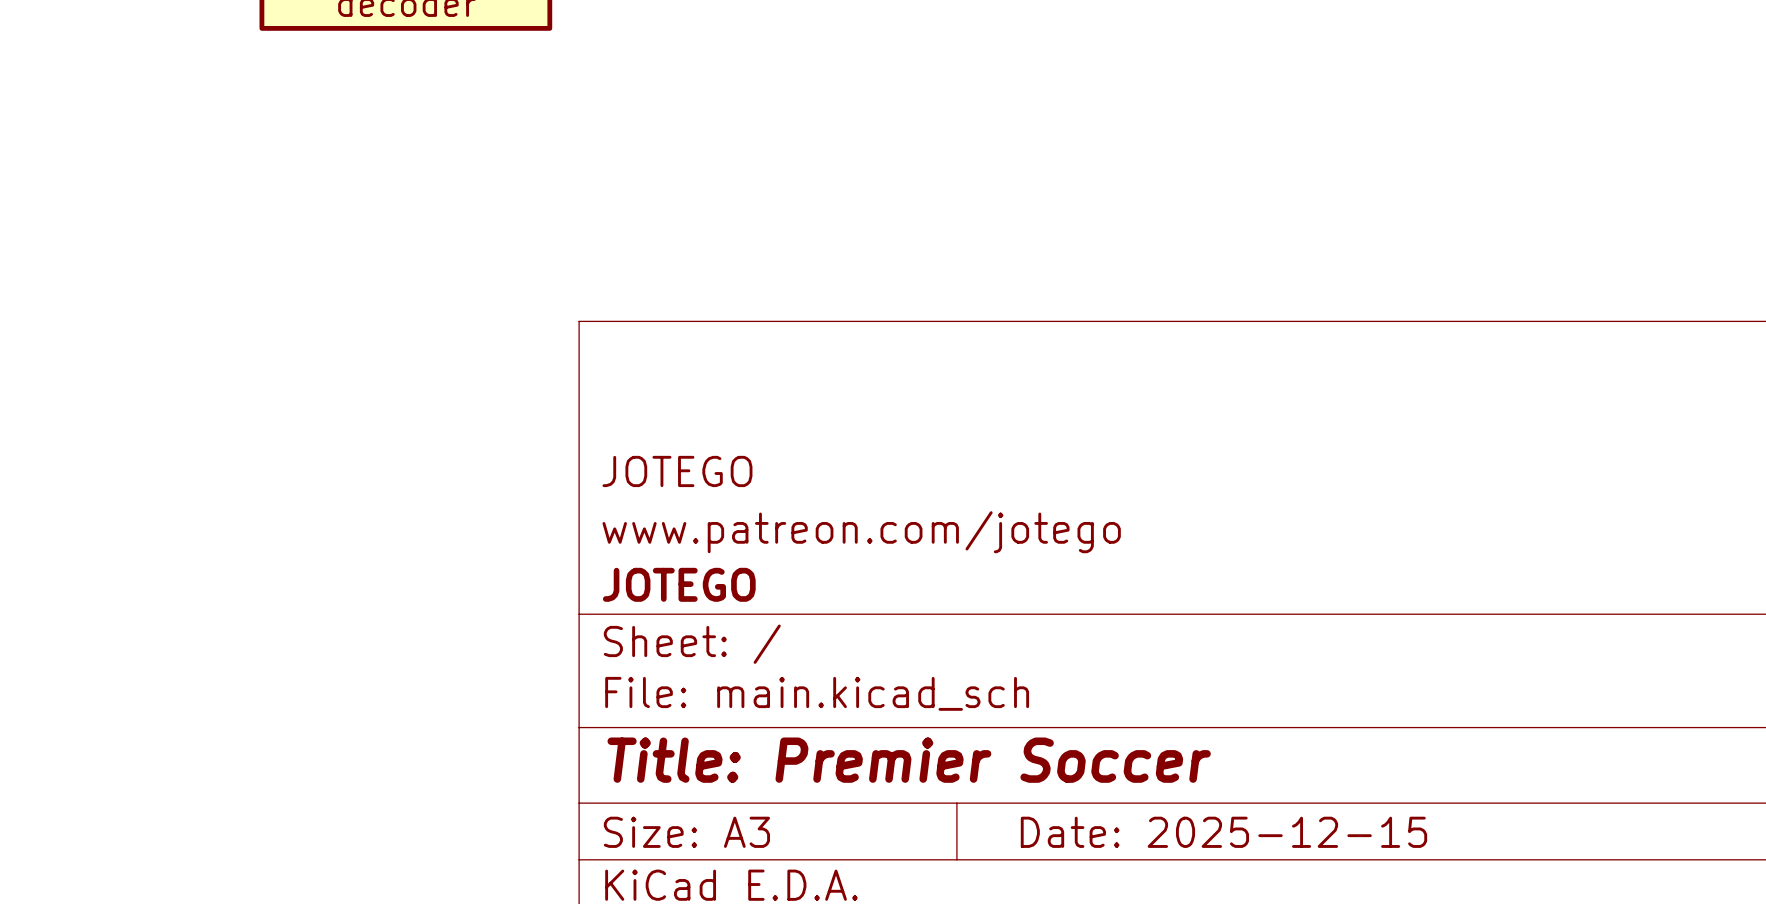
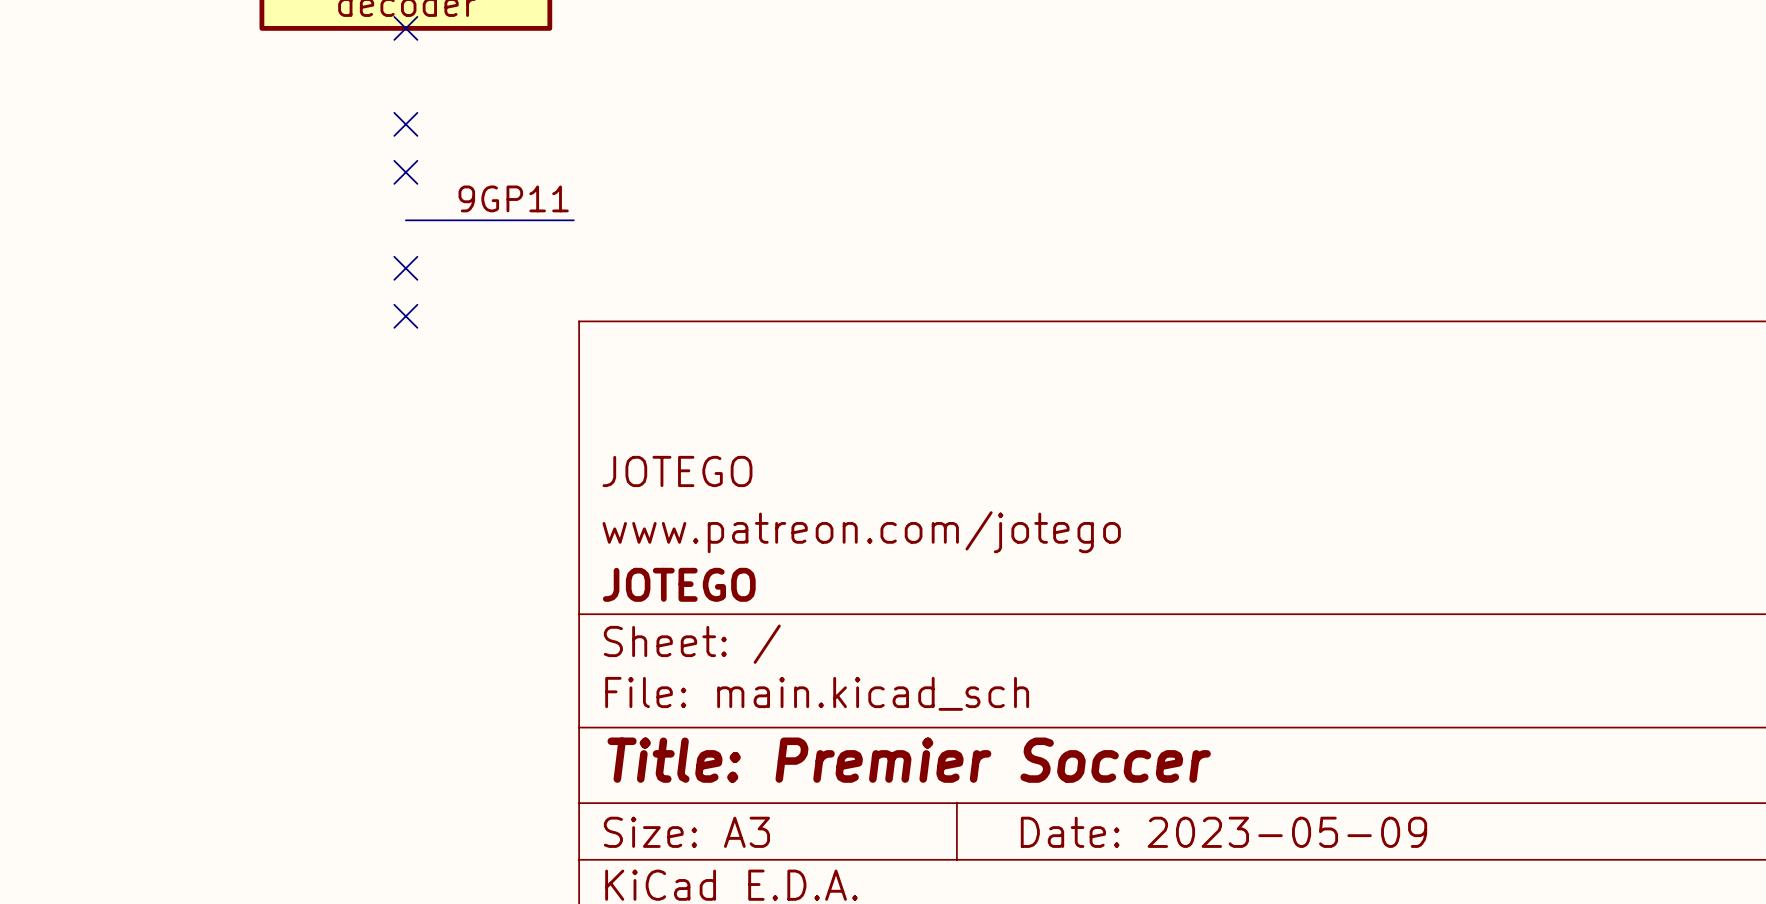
no-connect mark: none -> (405, 28)
no-connect mark: none -> (405, 124)
no-connect mark: none -> (405, 172)
label: none -> 9GP11 (513, 198)
wire: none -> (405, 220) (573, 220)
no-connect mark: none -> (405, 268)
no-connect mark: none -> (405, 316)
title block: Date: 2025-12-15 (1223, 832) -> Date: 2023-05-09 (1223, 832)

